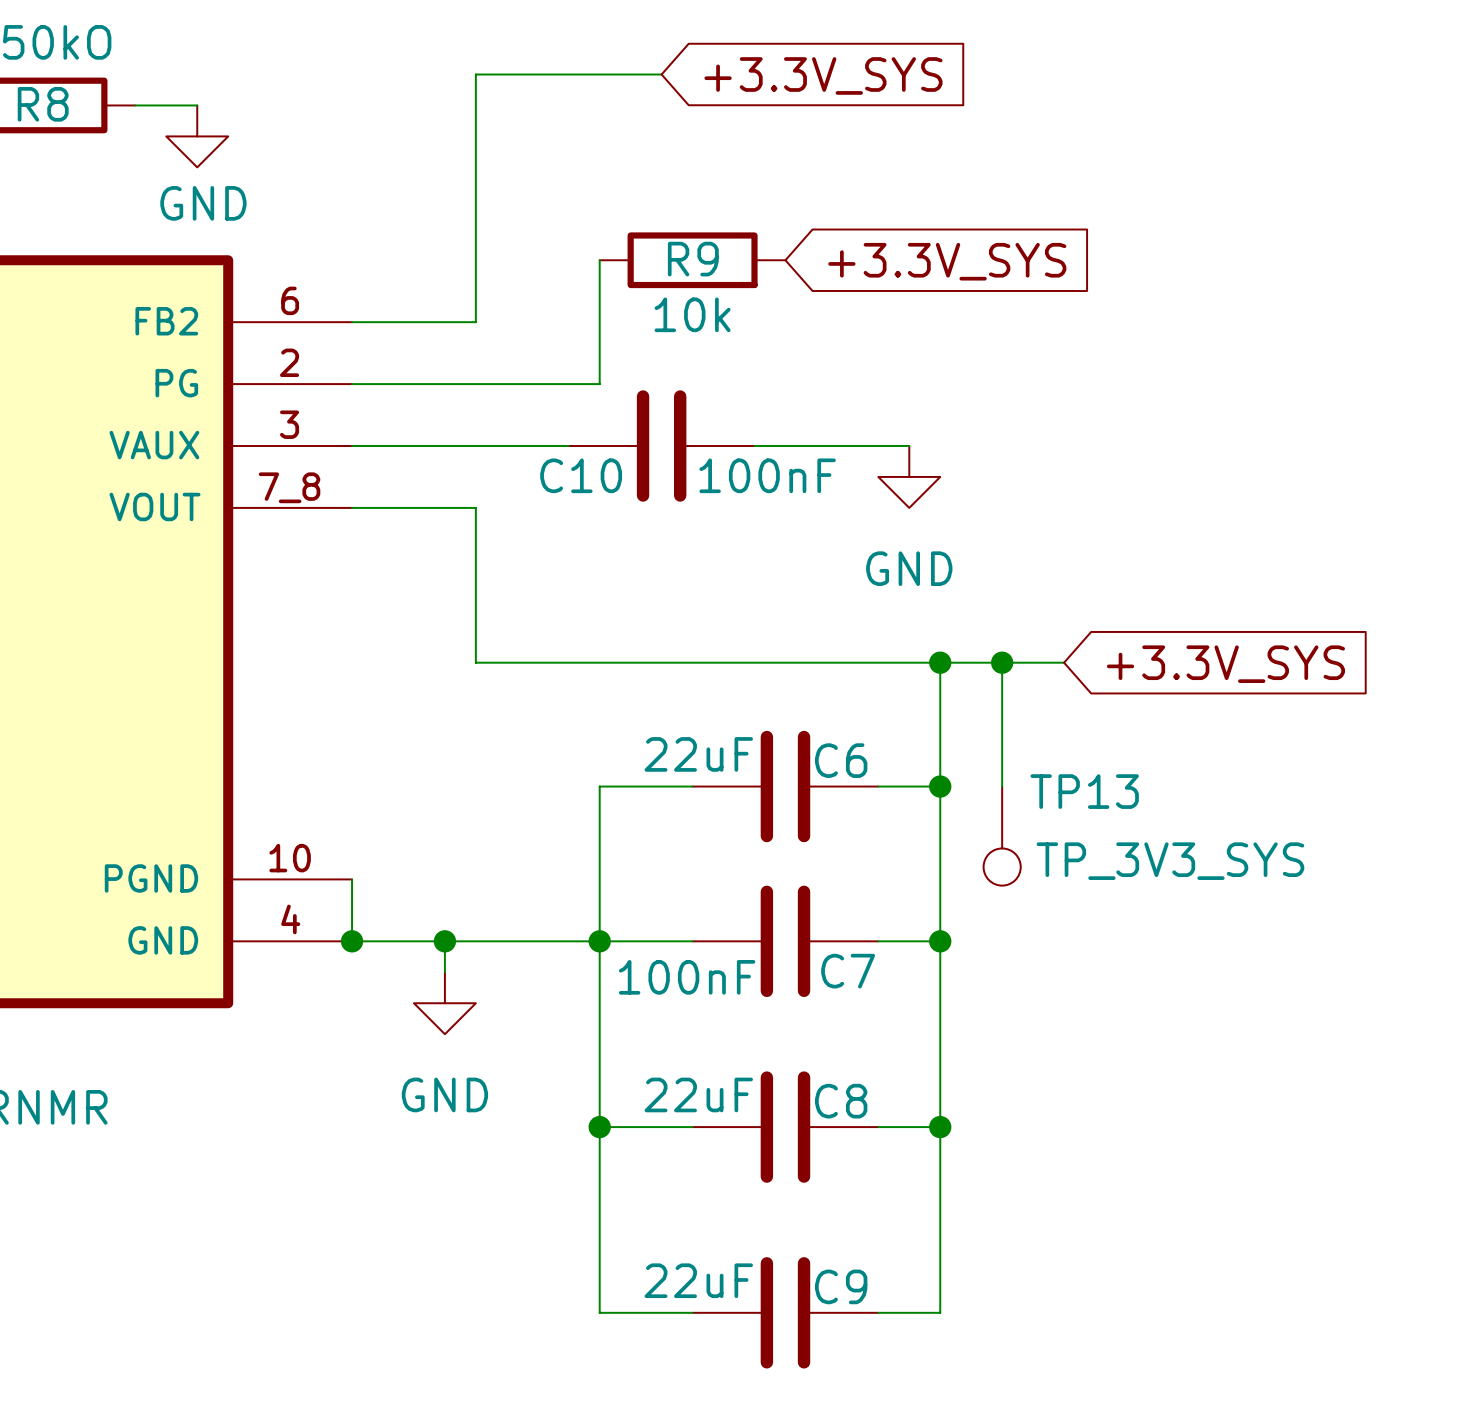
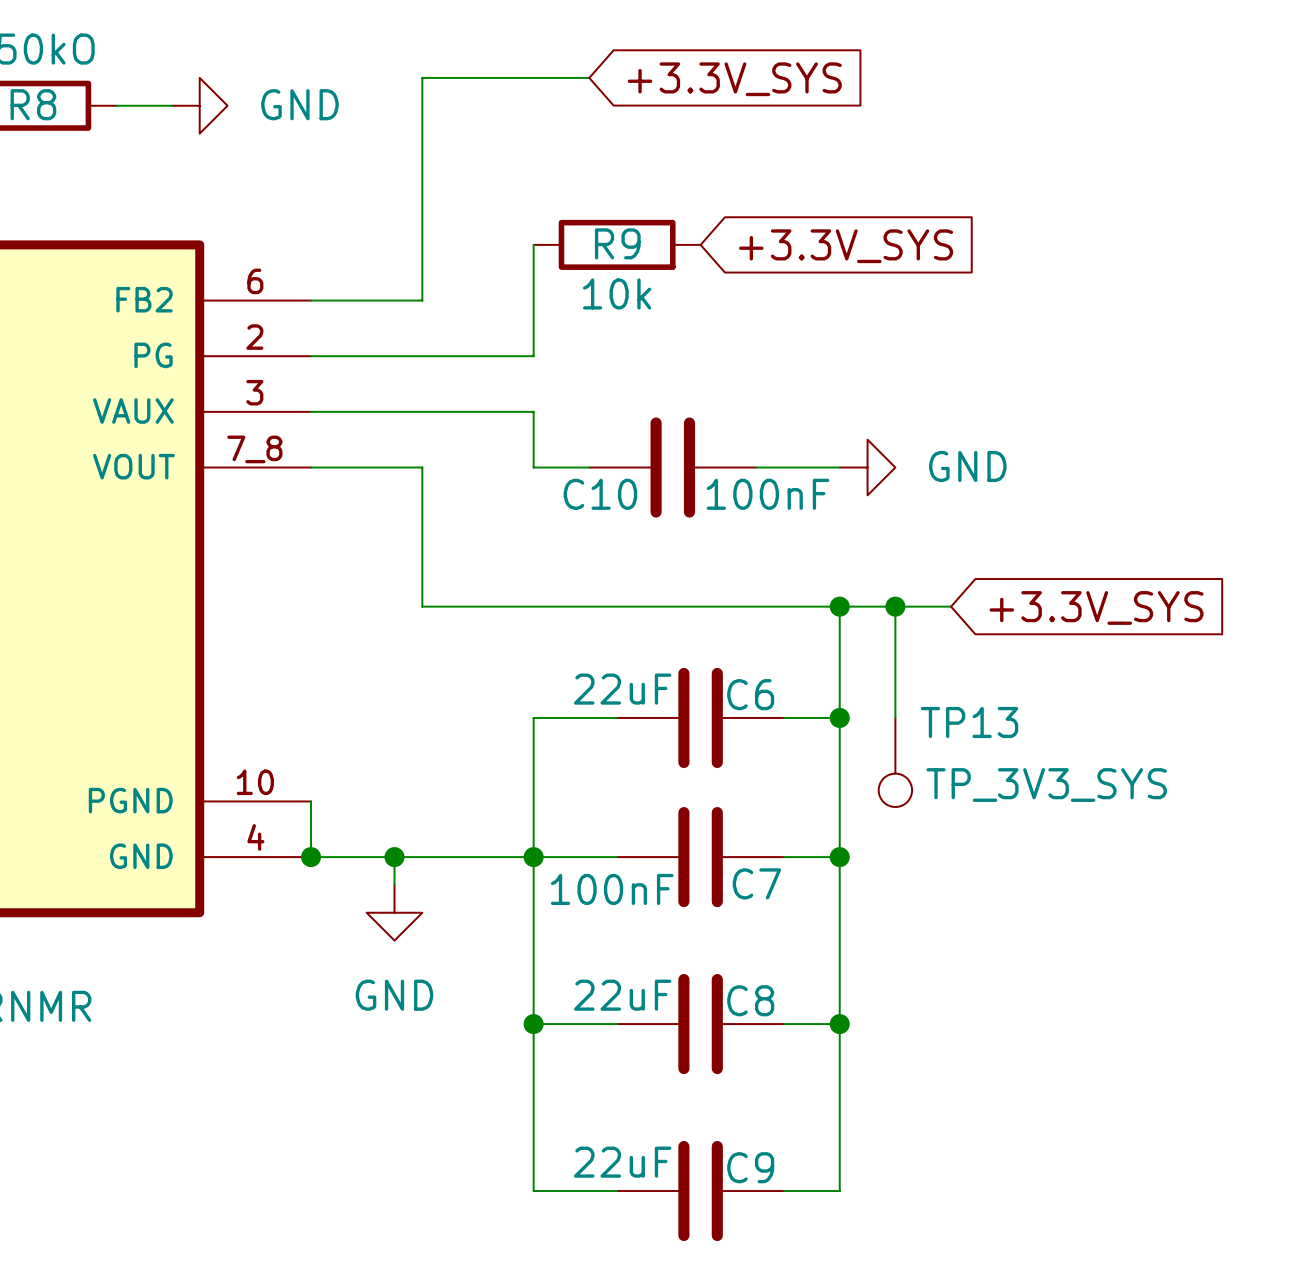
power symbol rotation: 0° (197, 136) -> 90° counterclockwise (199, 105)
power symbol position: GND (197, 136) -> GND (199, 105)
power symbol text position: GND (203, 203) -> GND (299, 104)
wire: none -> (505, 411) (533, 411) (533, 467) (589, 467)
C10 position: (661, 446) -> (672, 467)
wire: (754, 446) (909, 446) -> none
power symbol rotation: 0° (909, 476) -> 90° counterclockwise (867, 467)
power symbol position: GND (909, 476) -> GND (867, 467)
wire: none -> (756, 467) (839, 467)

